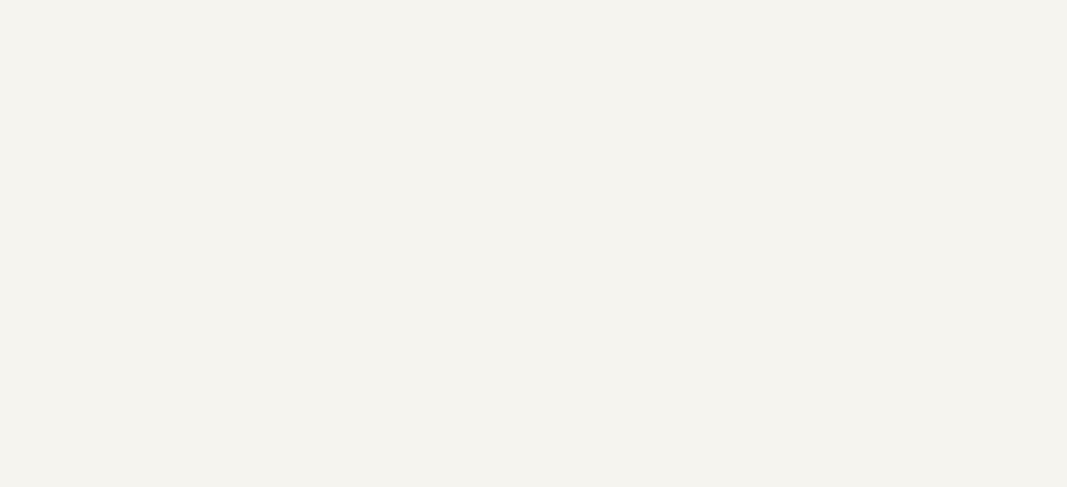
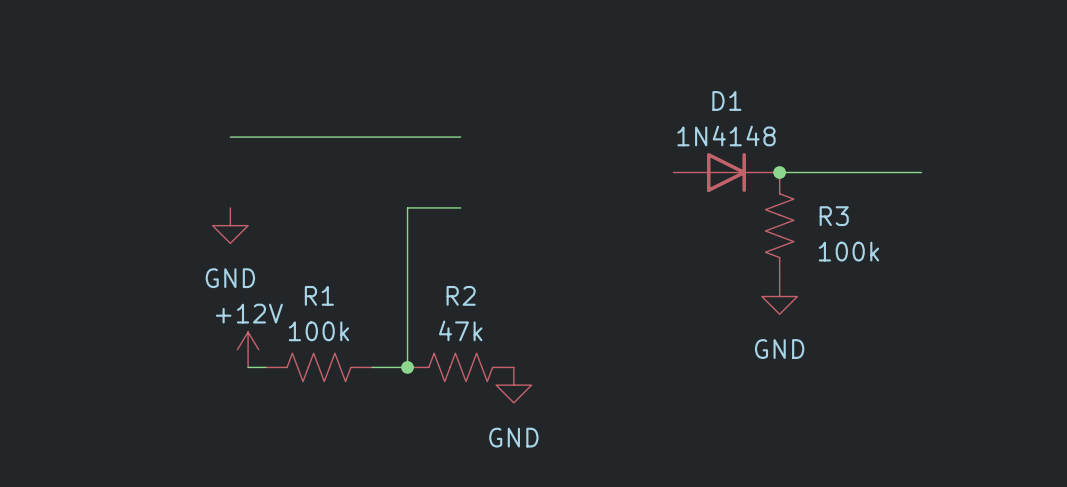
wire: none -> (230, 137) (460, 137)
D1: none -> 1N4148 (726, 172)
wire: none -> (779, 172) (921, 172)
junction: none -> (779, 172)
wire: none -> (460, 207) (407, 207) (407, 367) (372, 367)
power symbol: none -> GND (230, 225)
R3: none -> 100k (779, 225)
power symbol: none -> GND (779, 296)
power symbol: none -> +12V (248, 349)
wire: none -> (248, 367) (265, 367)
R1: none -> 100k (318, 367)
junction: none -> (407, 367)
R2: none -> 47k (460, 367)
power symbol: none -> GND (513, 385)

